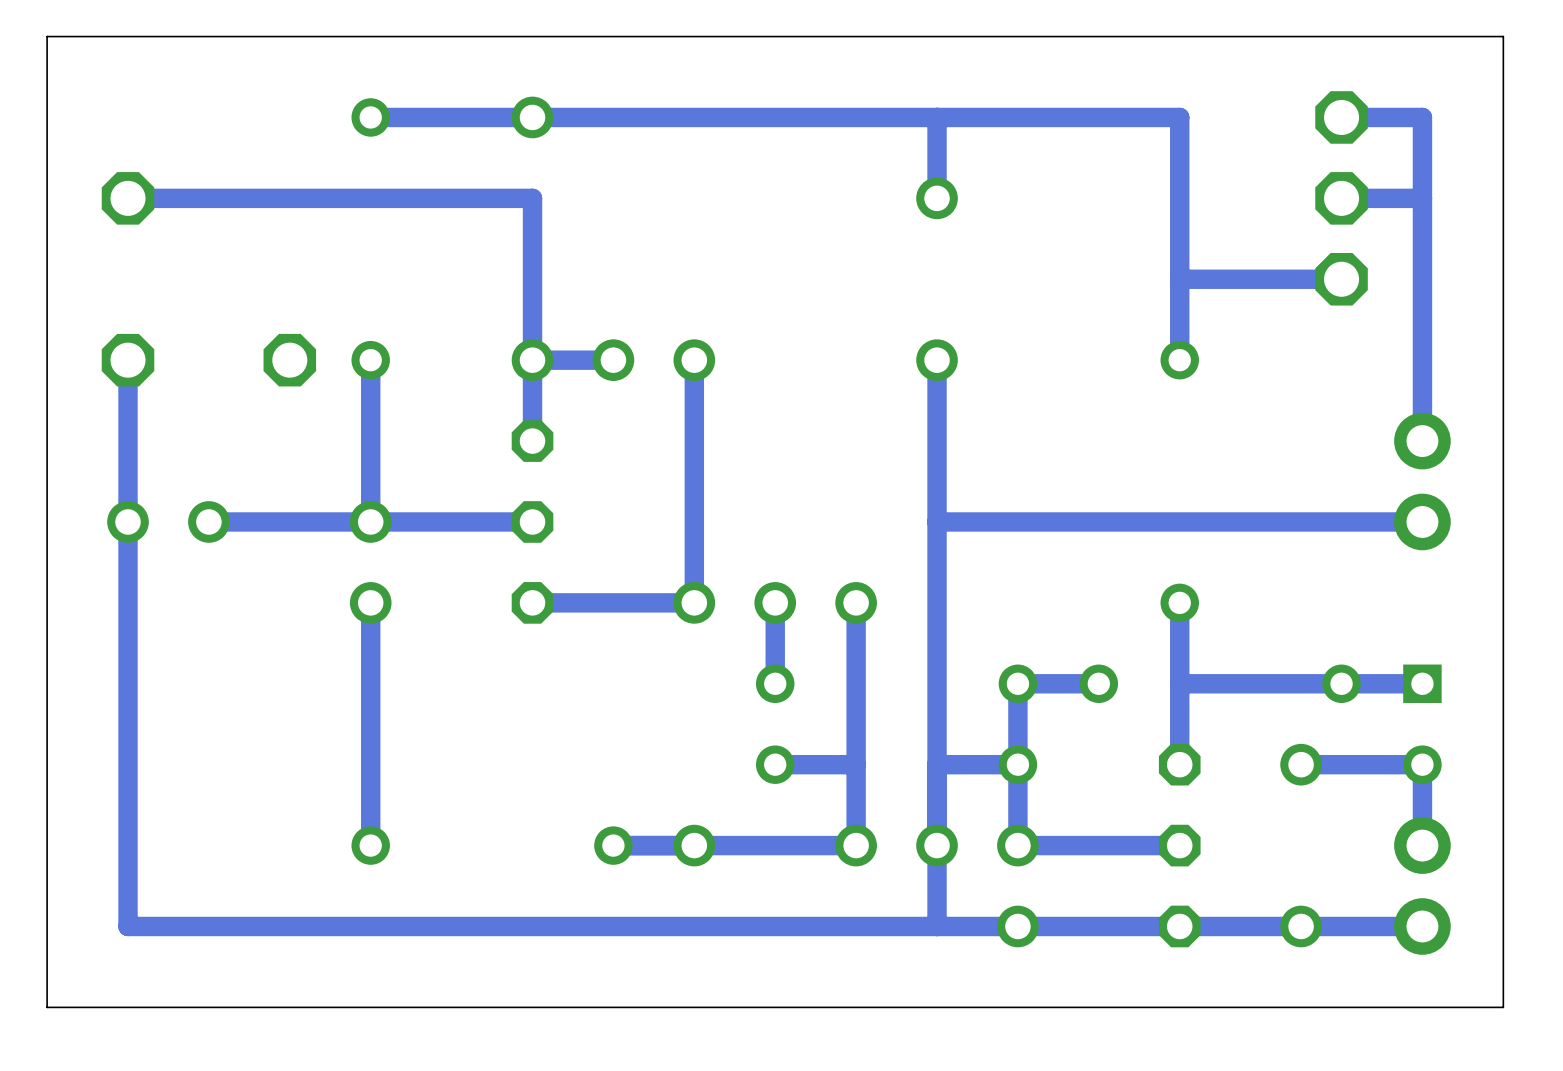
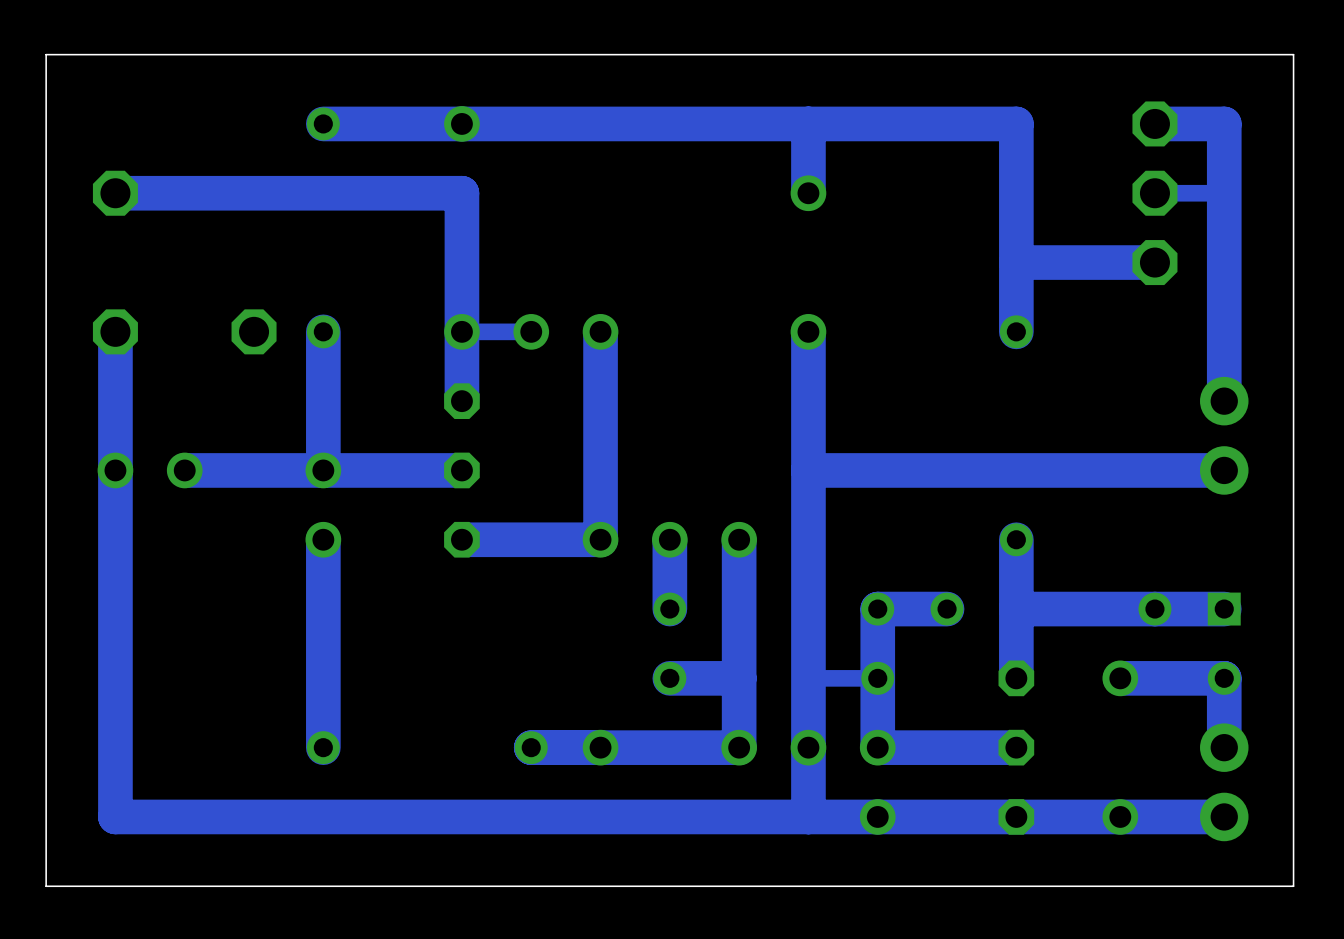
bottom track width: thin (370, 117) (1179, 117) (1179, 360) -> thick (323, 123) (1016, 123) (1016, 331)
bottom track width: thin (937, 117) (937, 198) -> thick (808, 123) (808, 193)
bottom track width: thin (1341, 117) (1422, 117) (1422, 441) -> thick (1154, 123) (1224, 123) (1224, 401)
bottom track width: thin (128, 198) (532, 198) (532, 441) -> thick (115, 193) (461, 193) (461, 401)
bottom track width: thin (1341, 279) (1179, 279) -> thick (1154, 262) (1016, 262)
bottom track width: thin (128, 360) (128, 926) (1422, 926) -> thick (115, 331) (115, 816) (1224, 816)
bottom track width: thin (370, 360) (370, 521) -> thick (323, 331) (323, 470)
bottom track width: thin (694, 360) (694, 602) (532, 602) -> thick (600, 331) (600, 539) (461, 539)
bottom track width: thin (937, 360) (937, 926) -> thick (808, 331) (808, 816)
bottom track width: thin (532, 521) (208, 521) -> thick (461, 470) (184, 470)
bottom track width: thin (1422, 521) (937, 521) -> thick (1224, 470) (808, 470)
bottom track width: thin (370, 602) (370, 845) -> thick (323, 539) (323, 747)
bottom track width: thin (775, 602) (775, 683) -> thick (669, 539) (669, 609)
bottom track width: thin (856, 602) (856, 845) (613, 845) -> thick (739, 539) (739, 747) (531, 747)
bottom track width: thin (1179, 602) (1179, 764) -> thick (1016, 539) (1016, 678)
bottom track width: thin (1098, 683) (1017, 683) (1017, 845) (1179, 845) -> thick (947, 609) (877, 609) (877, 747) (1016, 747)
bottom track width: thin (1422, 683) (1179, 683) -> thick (1224, 609) (1016, 609)
bottom track width: thin (856, 764) (775, 764) -> thick (739, 678) (669, 678)
bottom track width: thin (1301, 764) (1422, 764) (1422, 845) -> thick (1120, 678) (1224, 678) (1224, 747)

